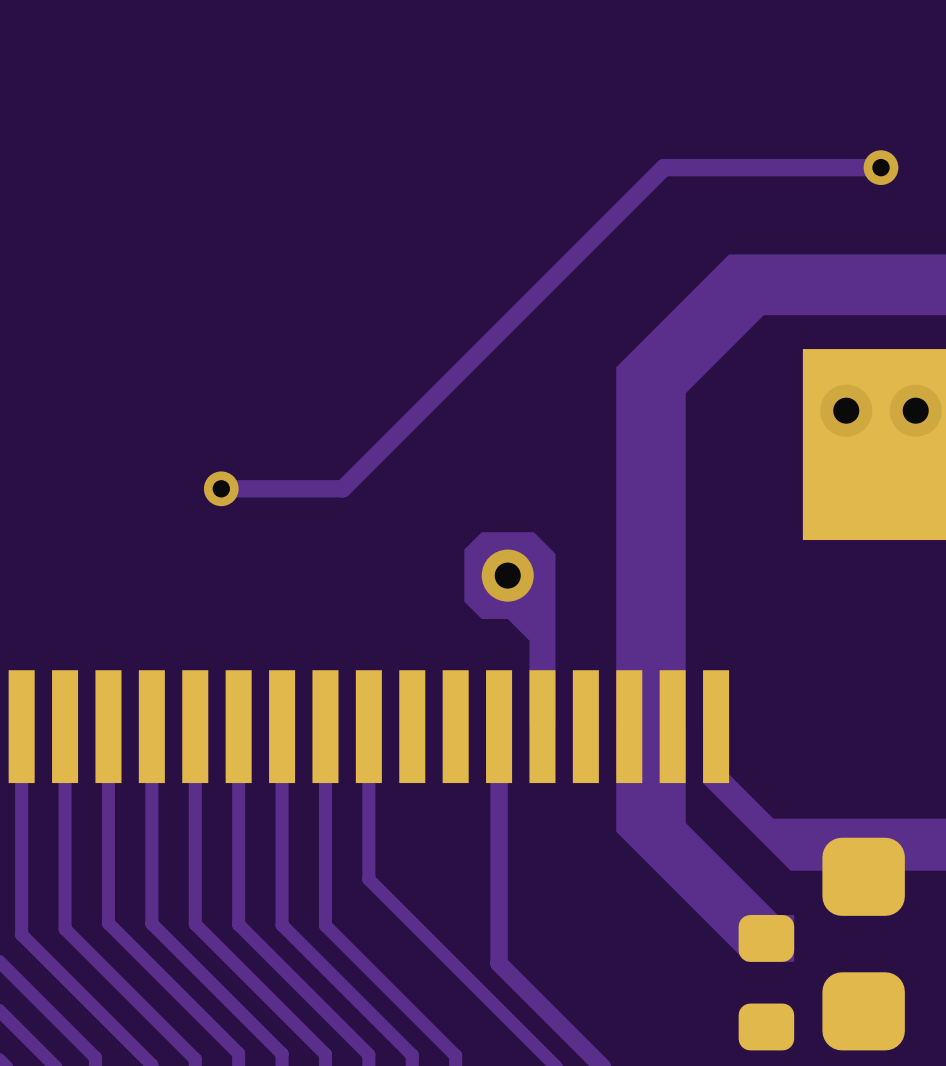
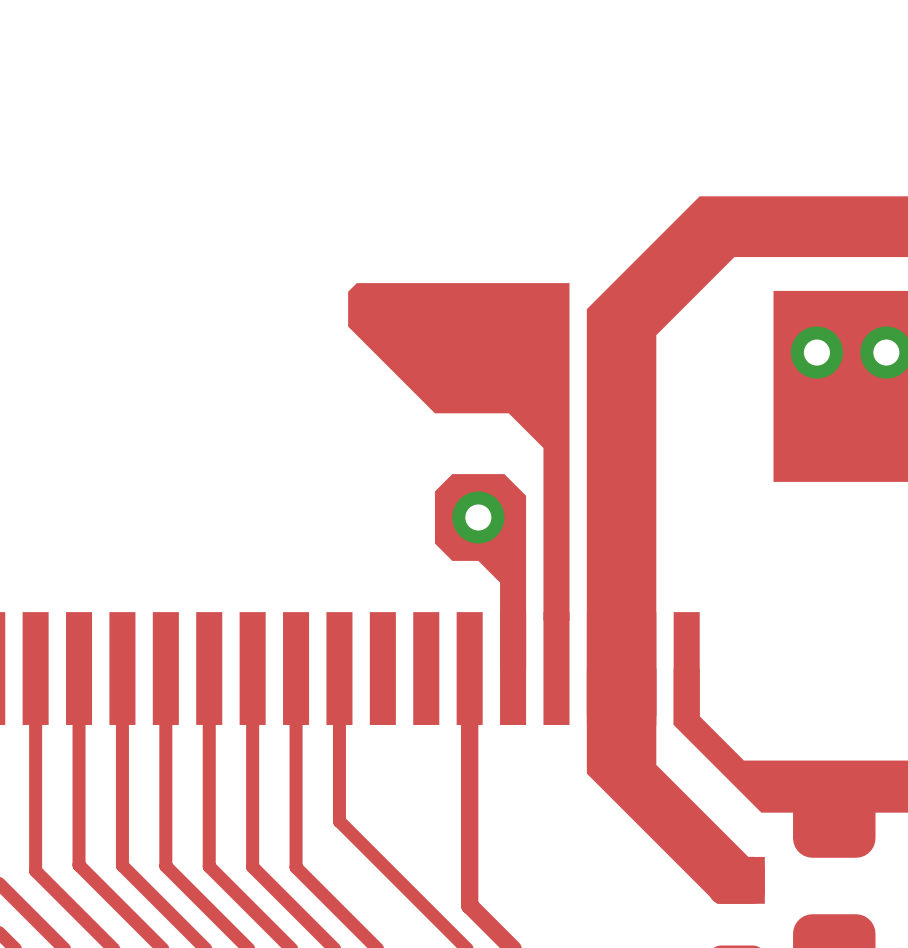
track: (880, 167) (663, 167) (342, 488) (221, 488) -> none
via: (880, 167) -> none
drawing: none -> [348, 283, 570, 621]
via: (221, 488) -> none

